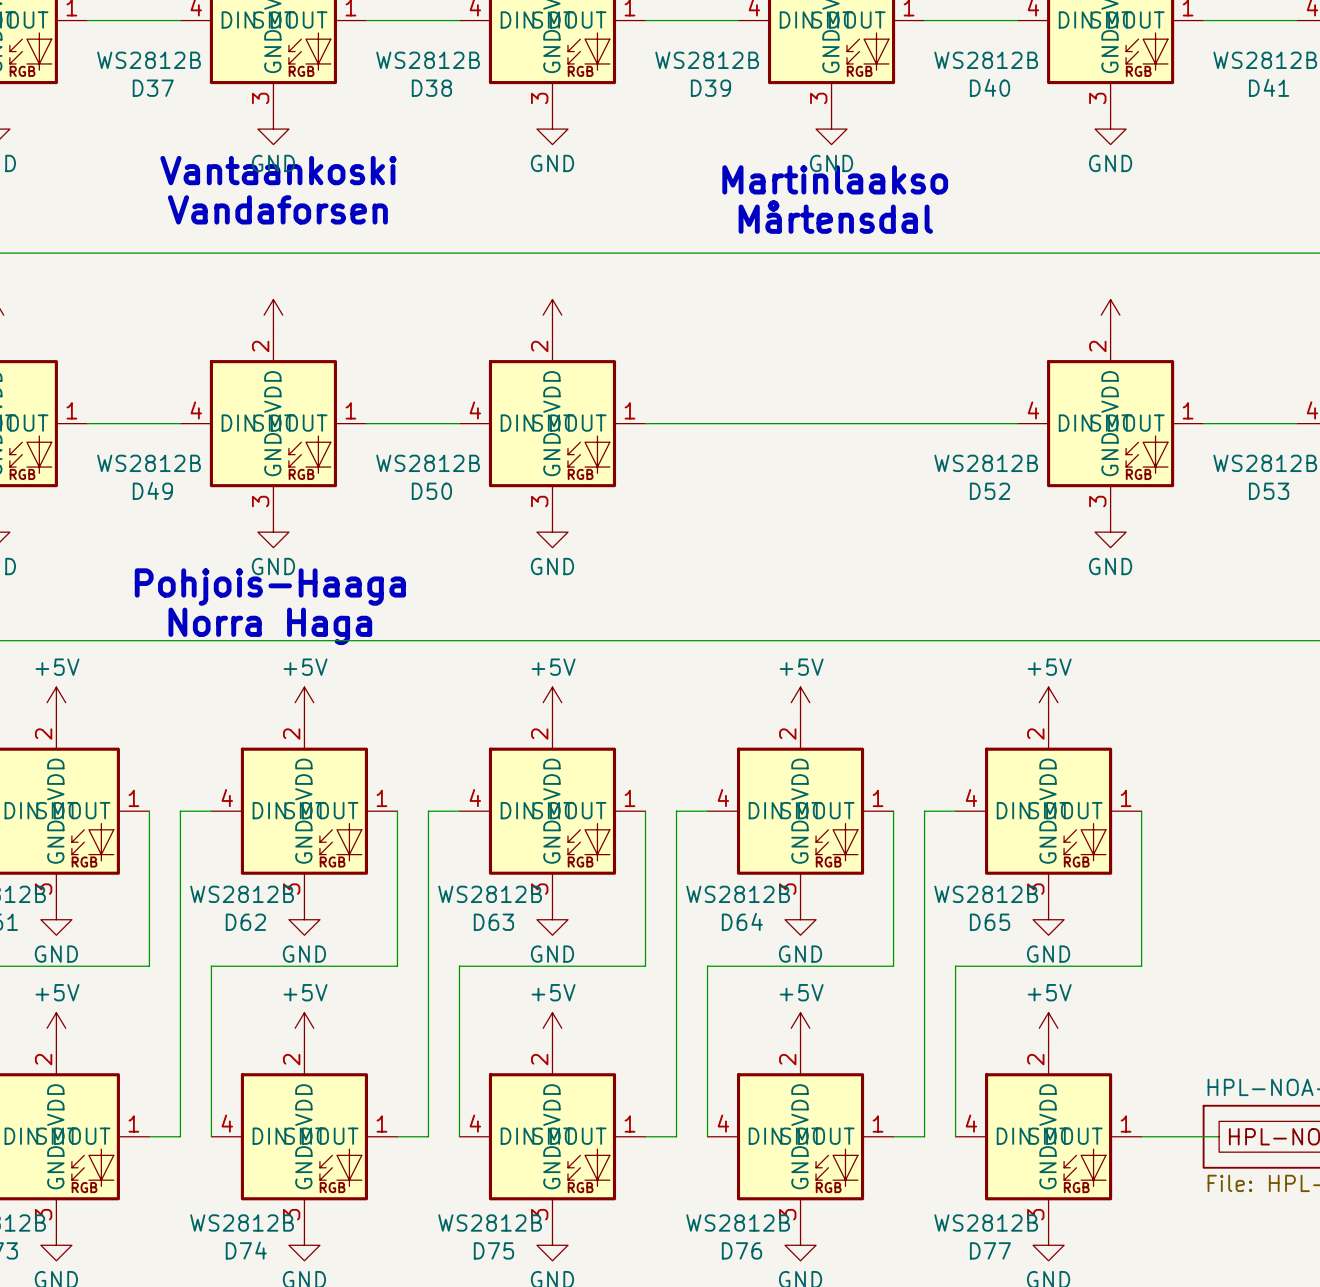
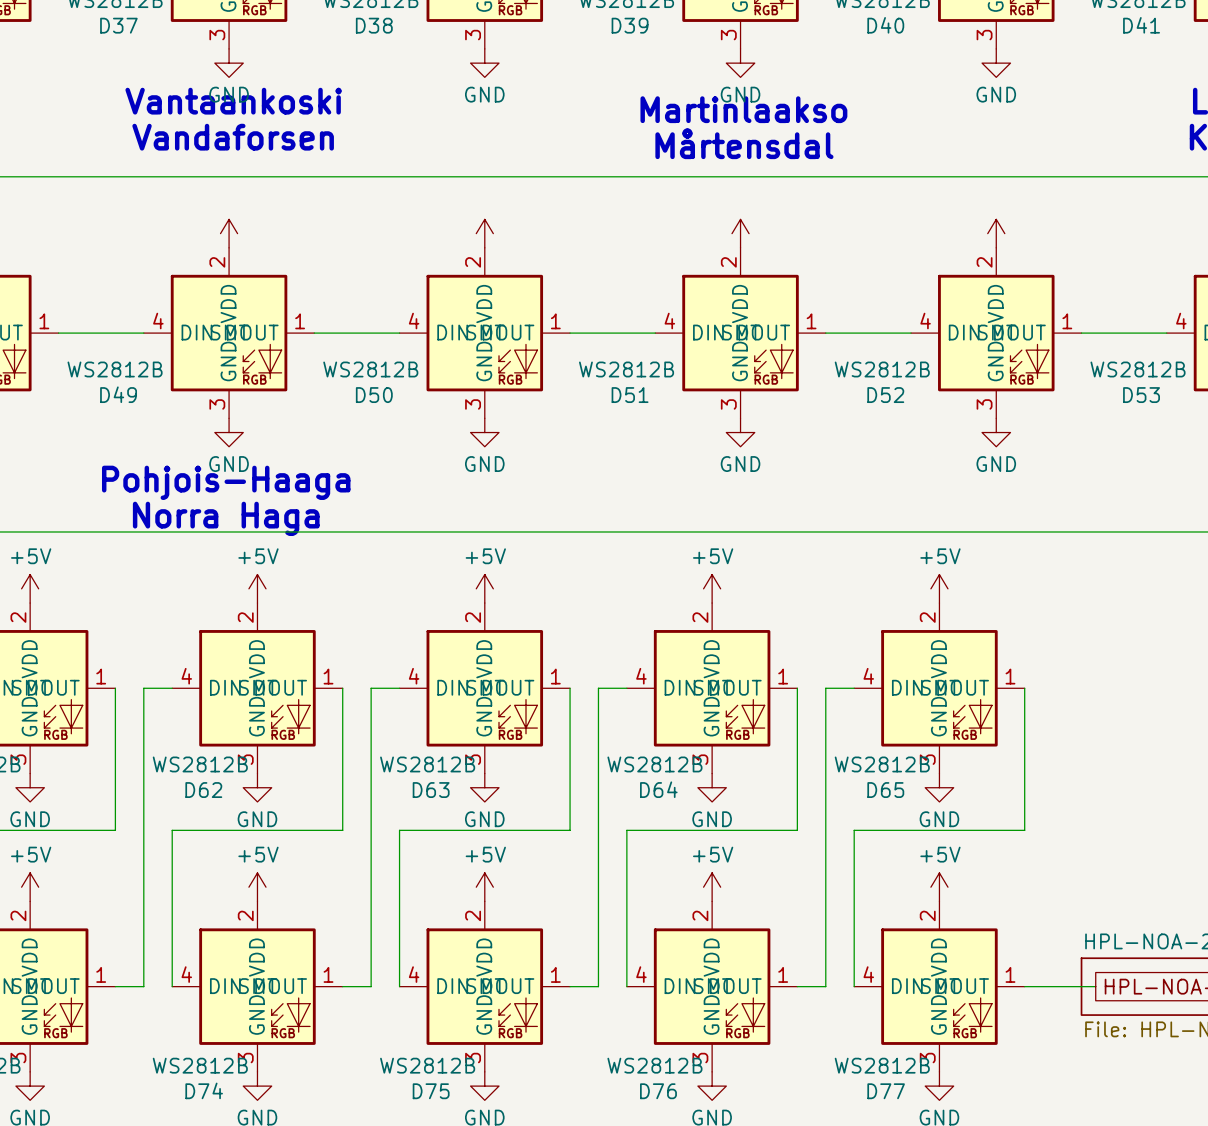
power symbol: none -> (740, 233)
D51: none -> WS2812B (740, 333)
power symbol: none -> GND (740, 432)

